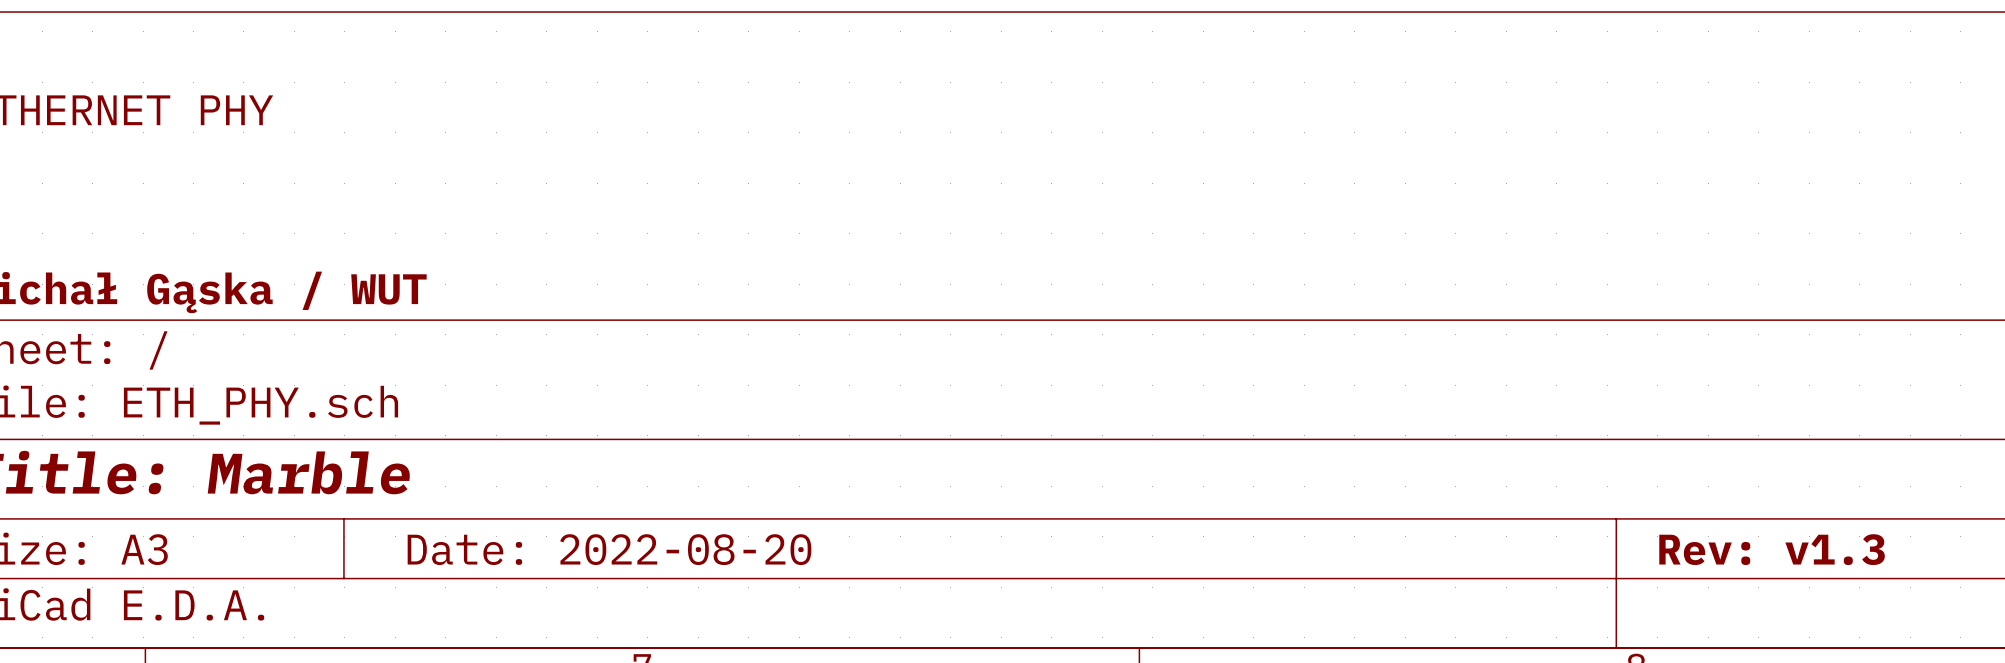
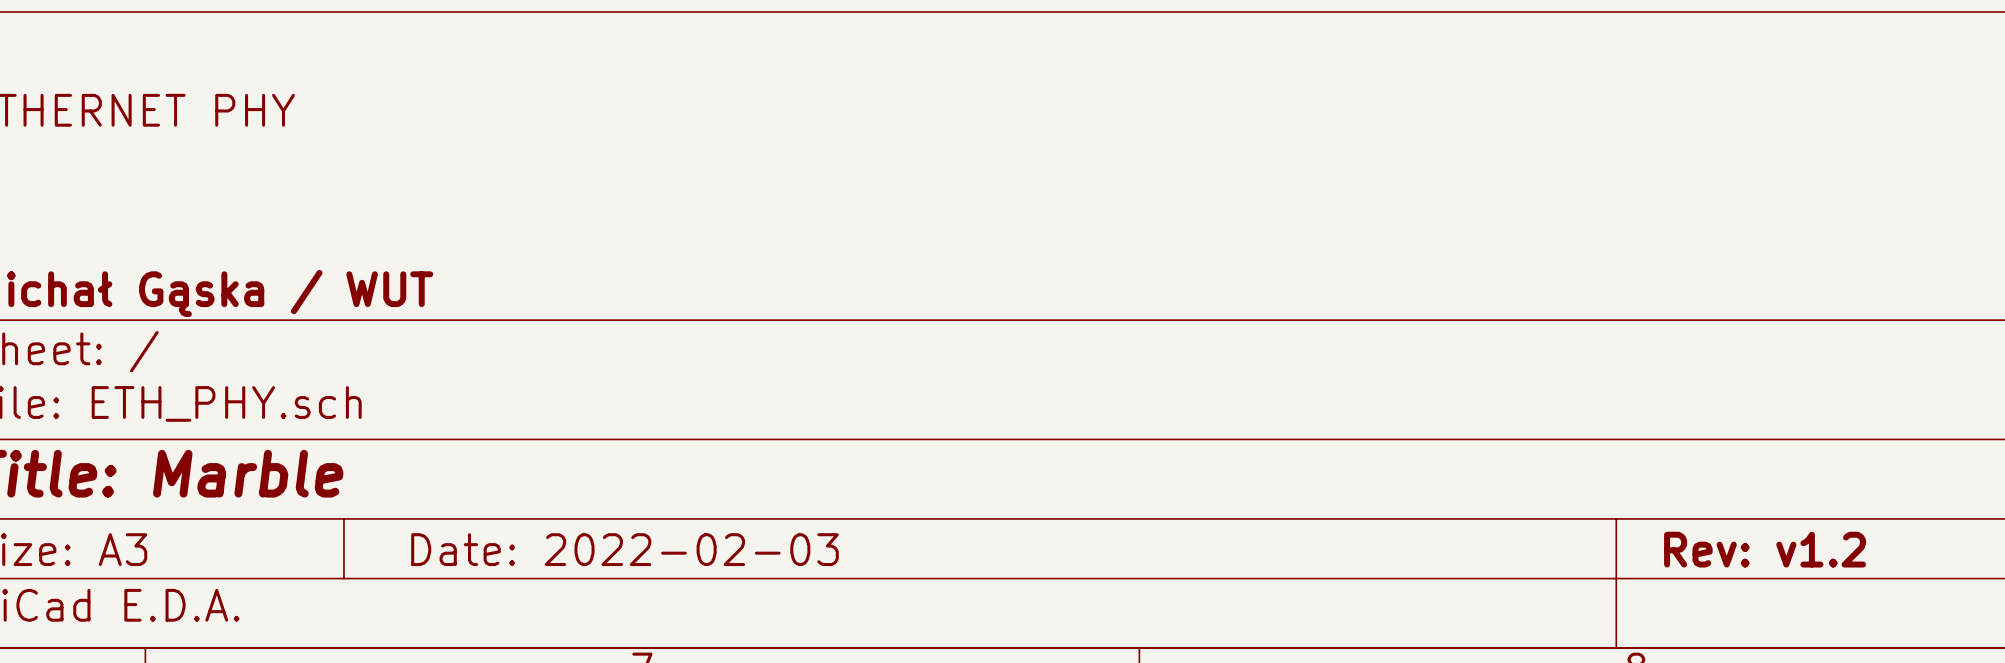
title block: Date: 2022-08-20 (609, 549) -> Date: 2022-02-03 (624, 549)
title block: Rev: v1.3 (1772, 549) -> Rev: v1.2 (1765, 549)

